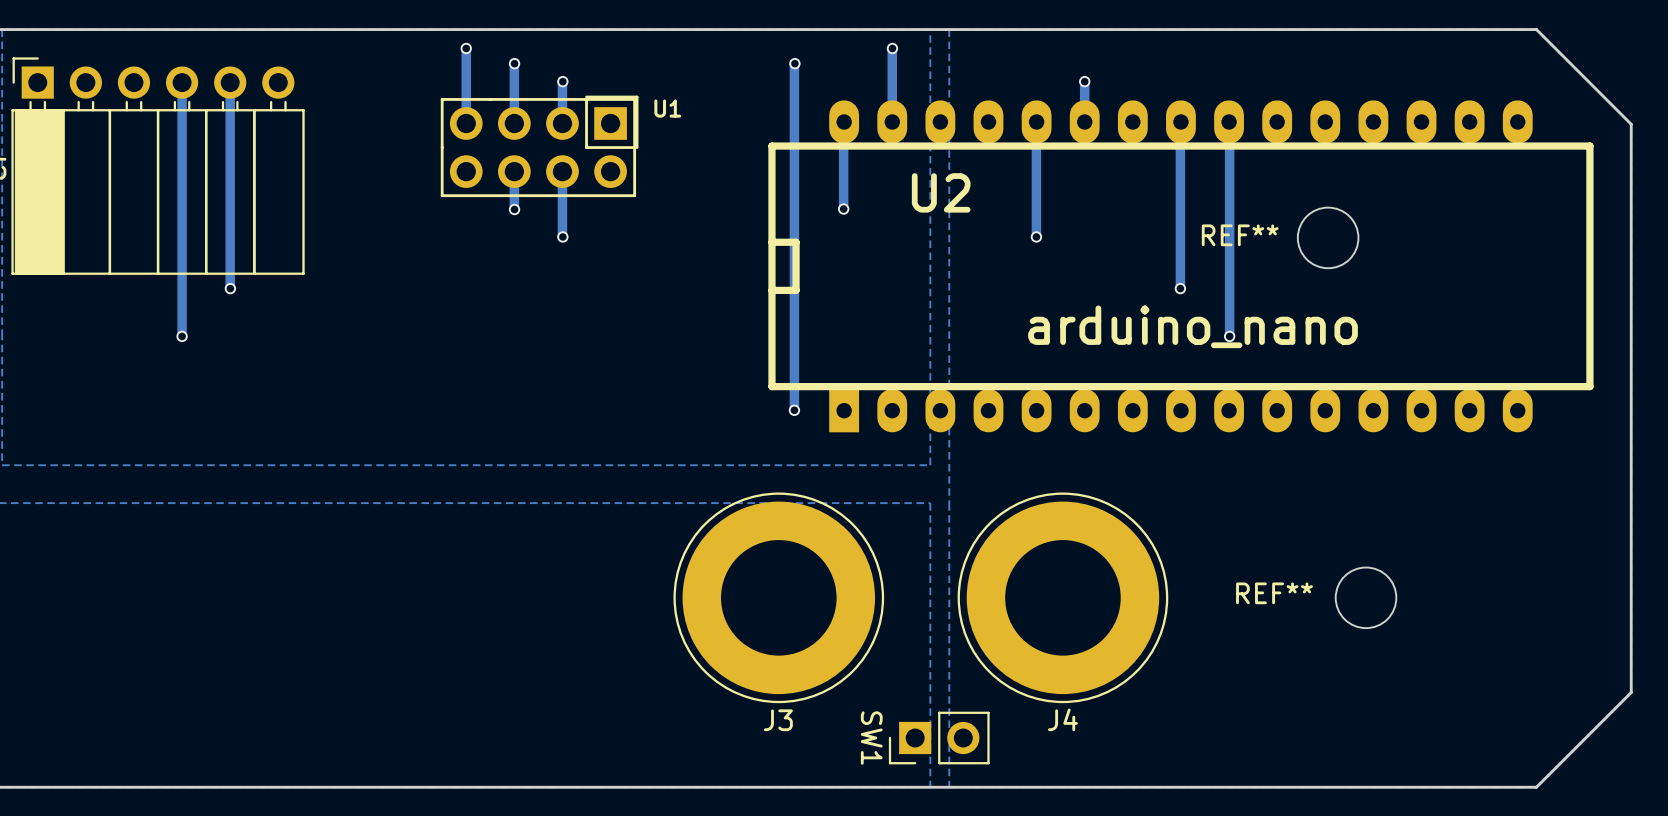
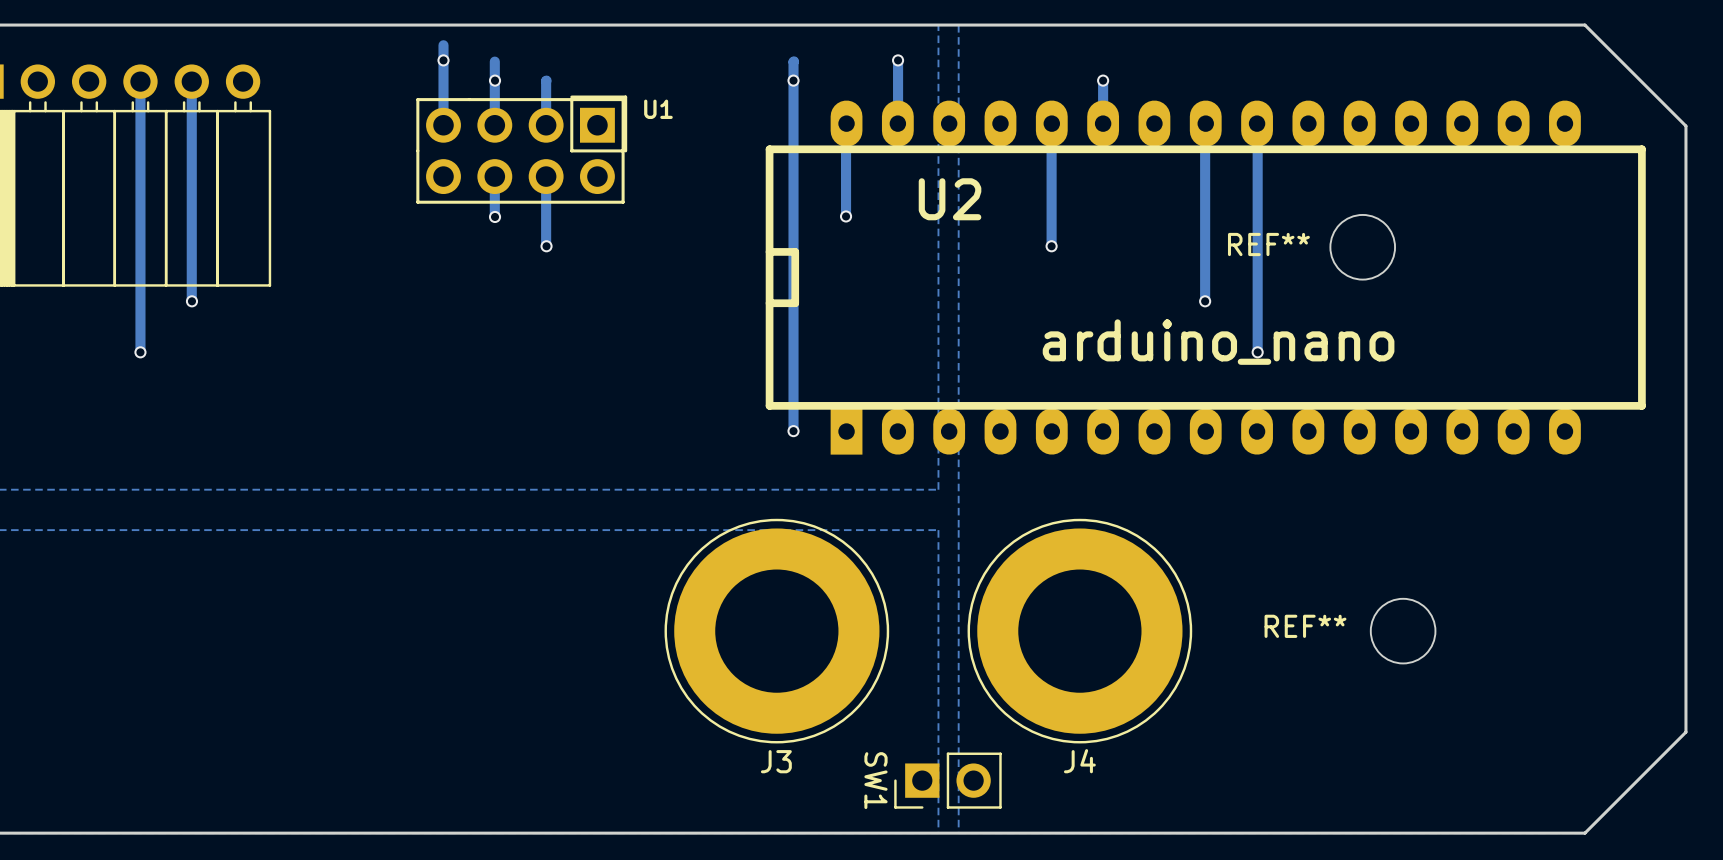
via position: (466, 48) -> (443, 60)
track: (892, 48) (892, 121) -> (898, 60) (898, 123)
via position: (892, 48) -> (898, 60)
via position: (514, 63) -> (495, 80)
via position: (794, 63) -> (793, 80)
via: (562, 81) -> none

